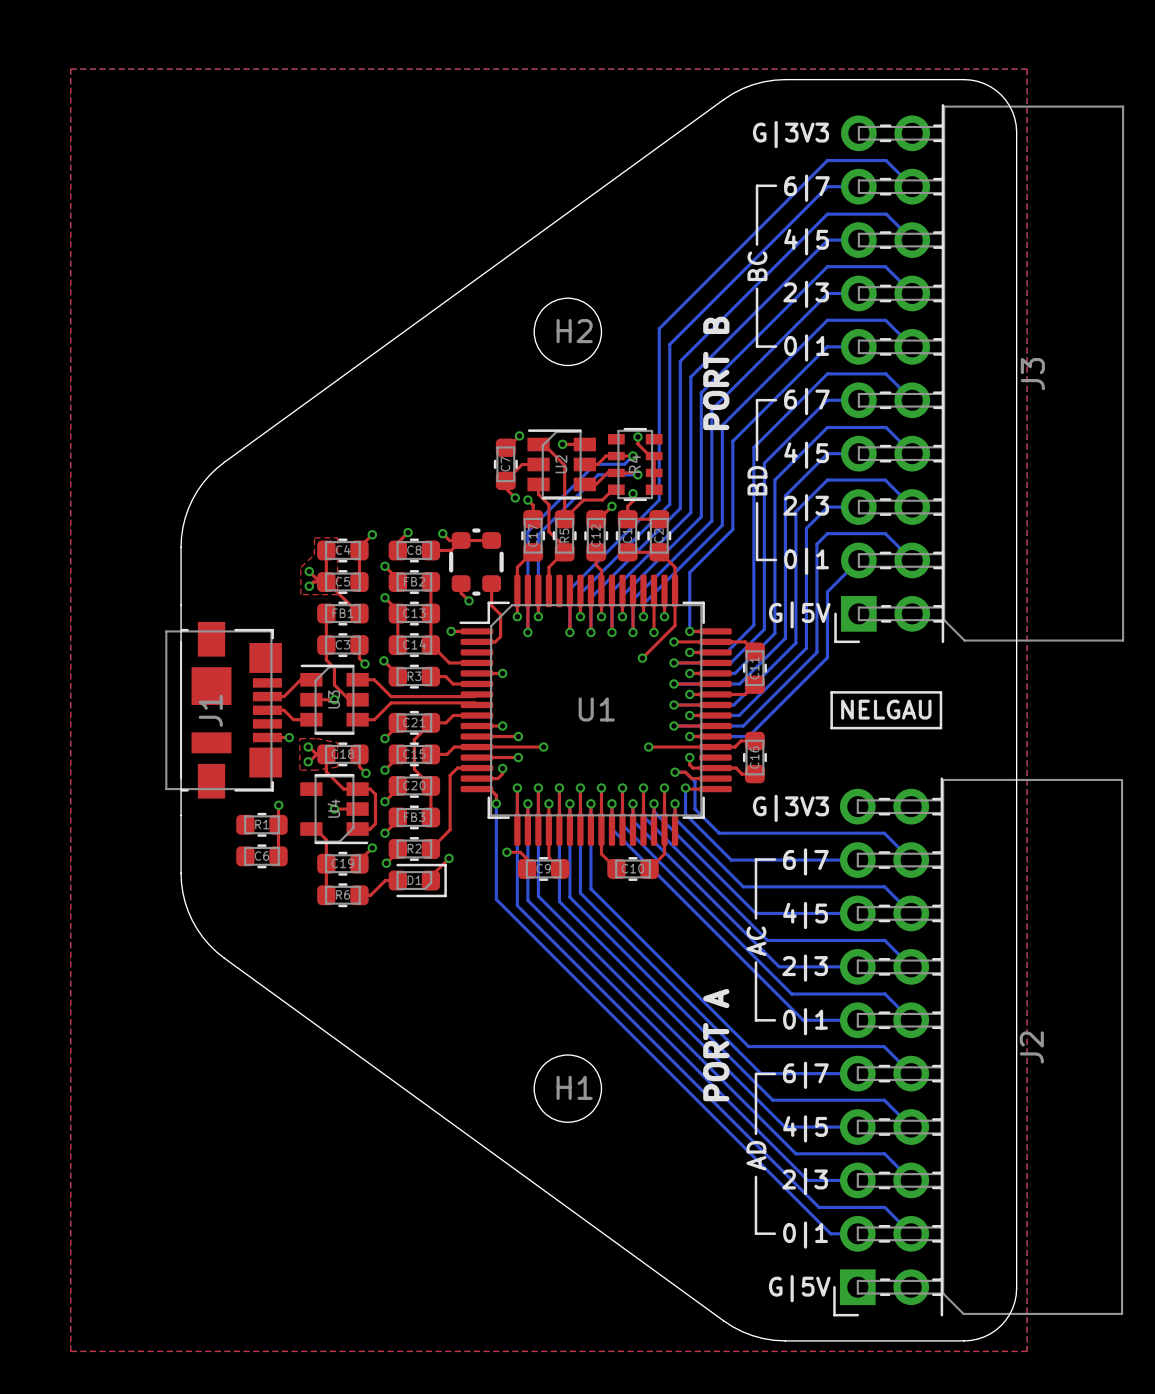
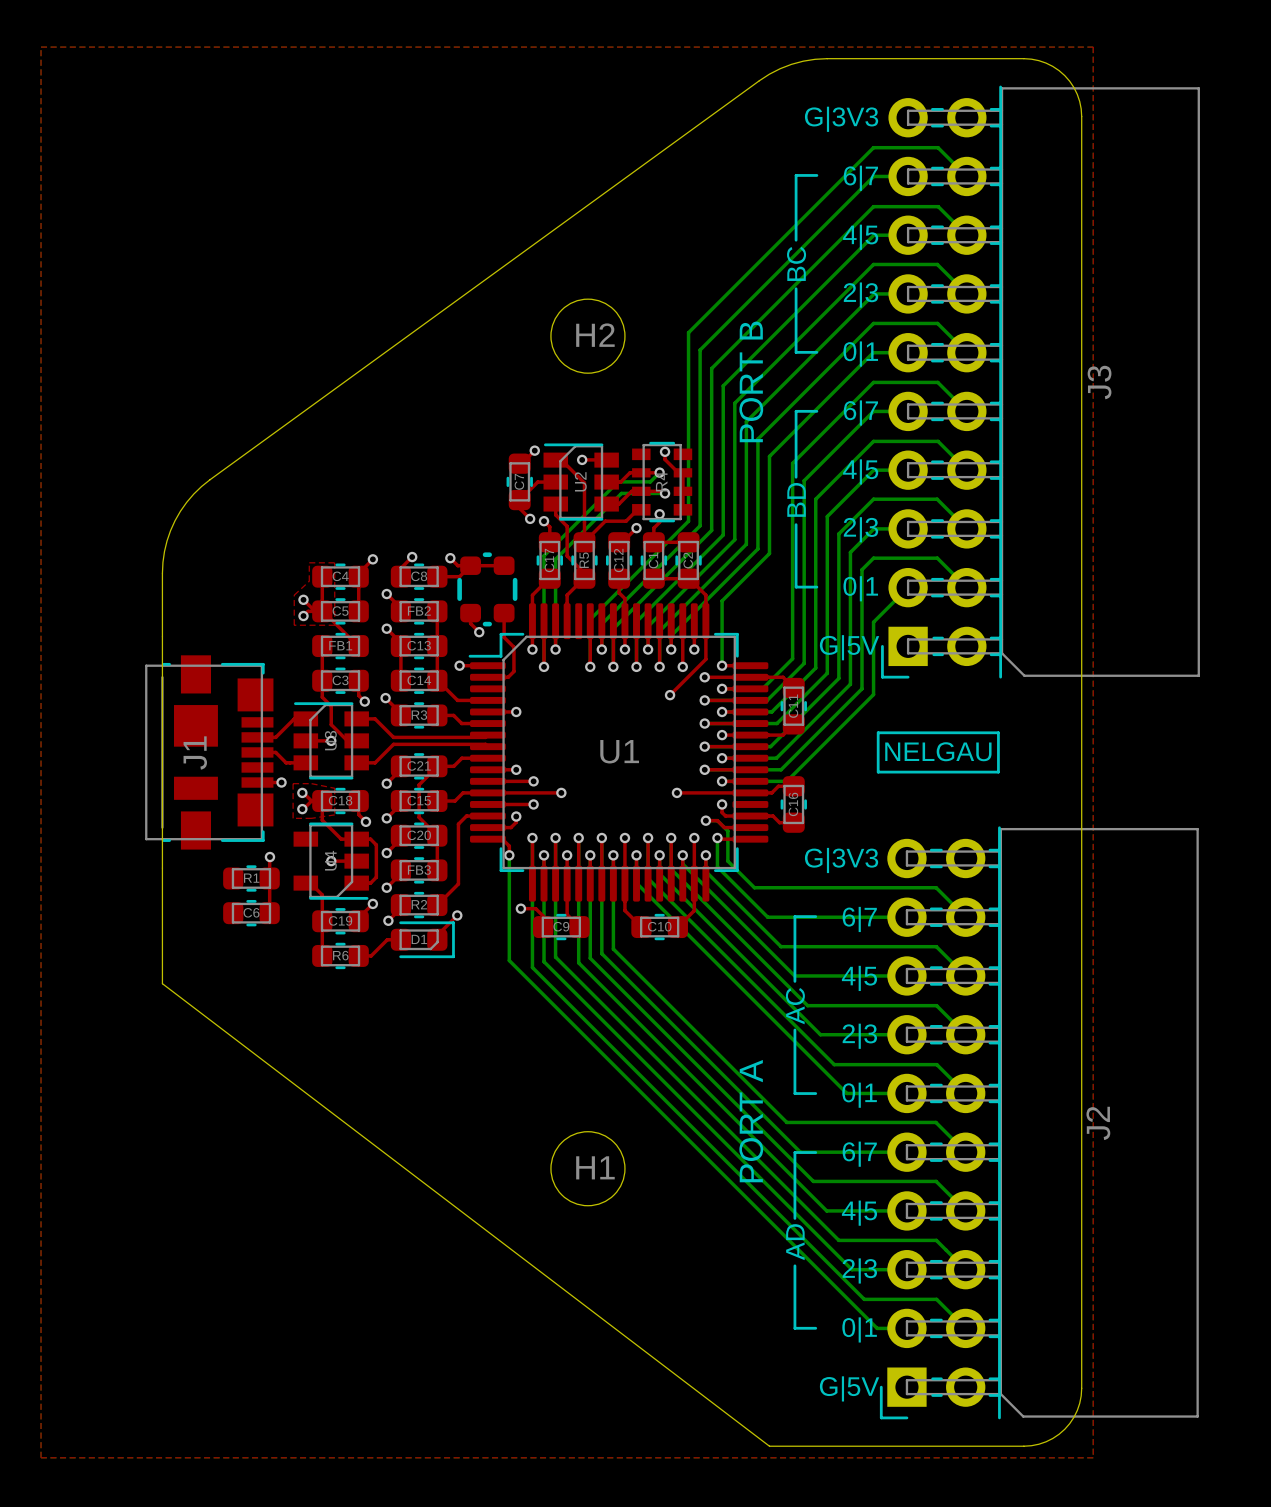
board edge: (181, 873) (182, 892) (192, 920) (203, 937) (224, 958) (723, 1320) (752, 1335) (785, 1340) -> (162, 931) (162, 983) (769, 1446) (827, 1446)

